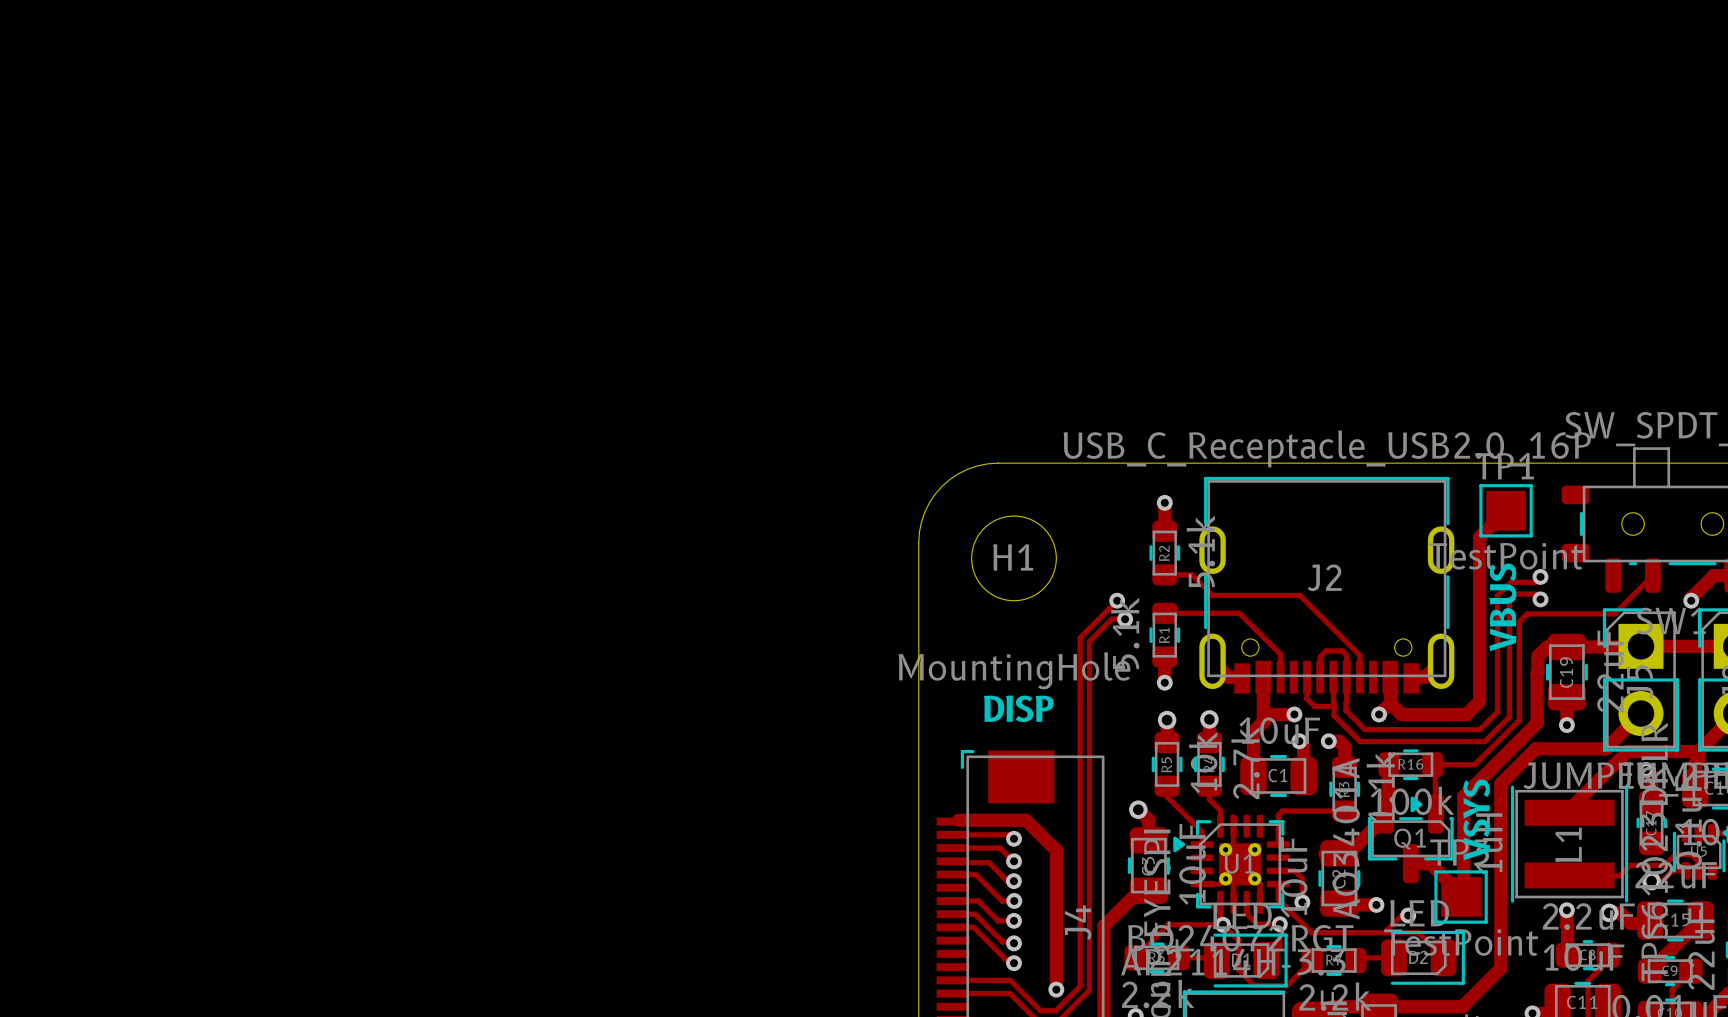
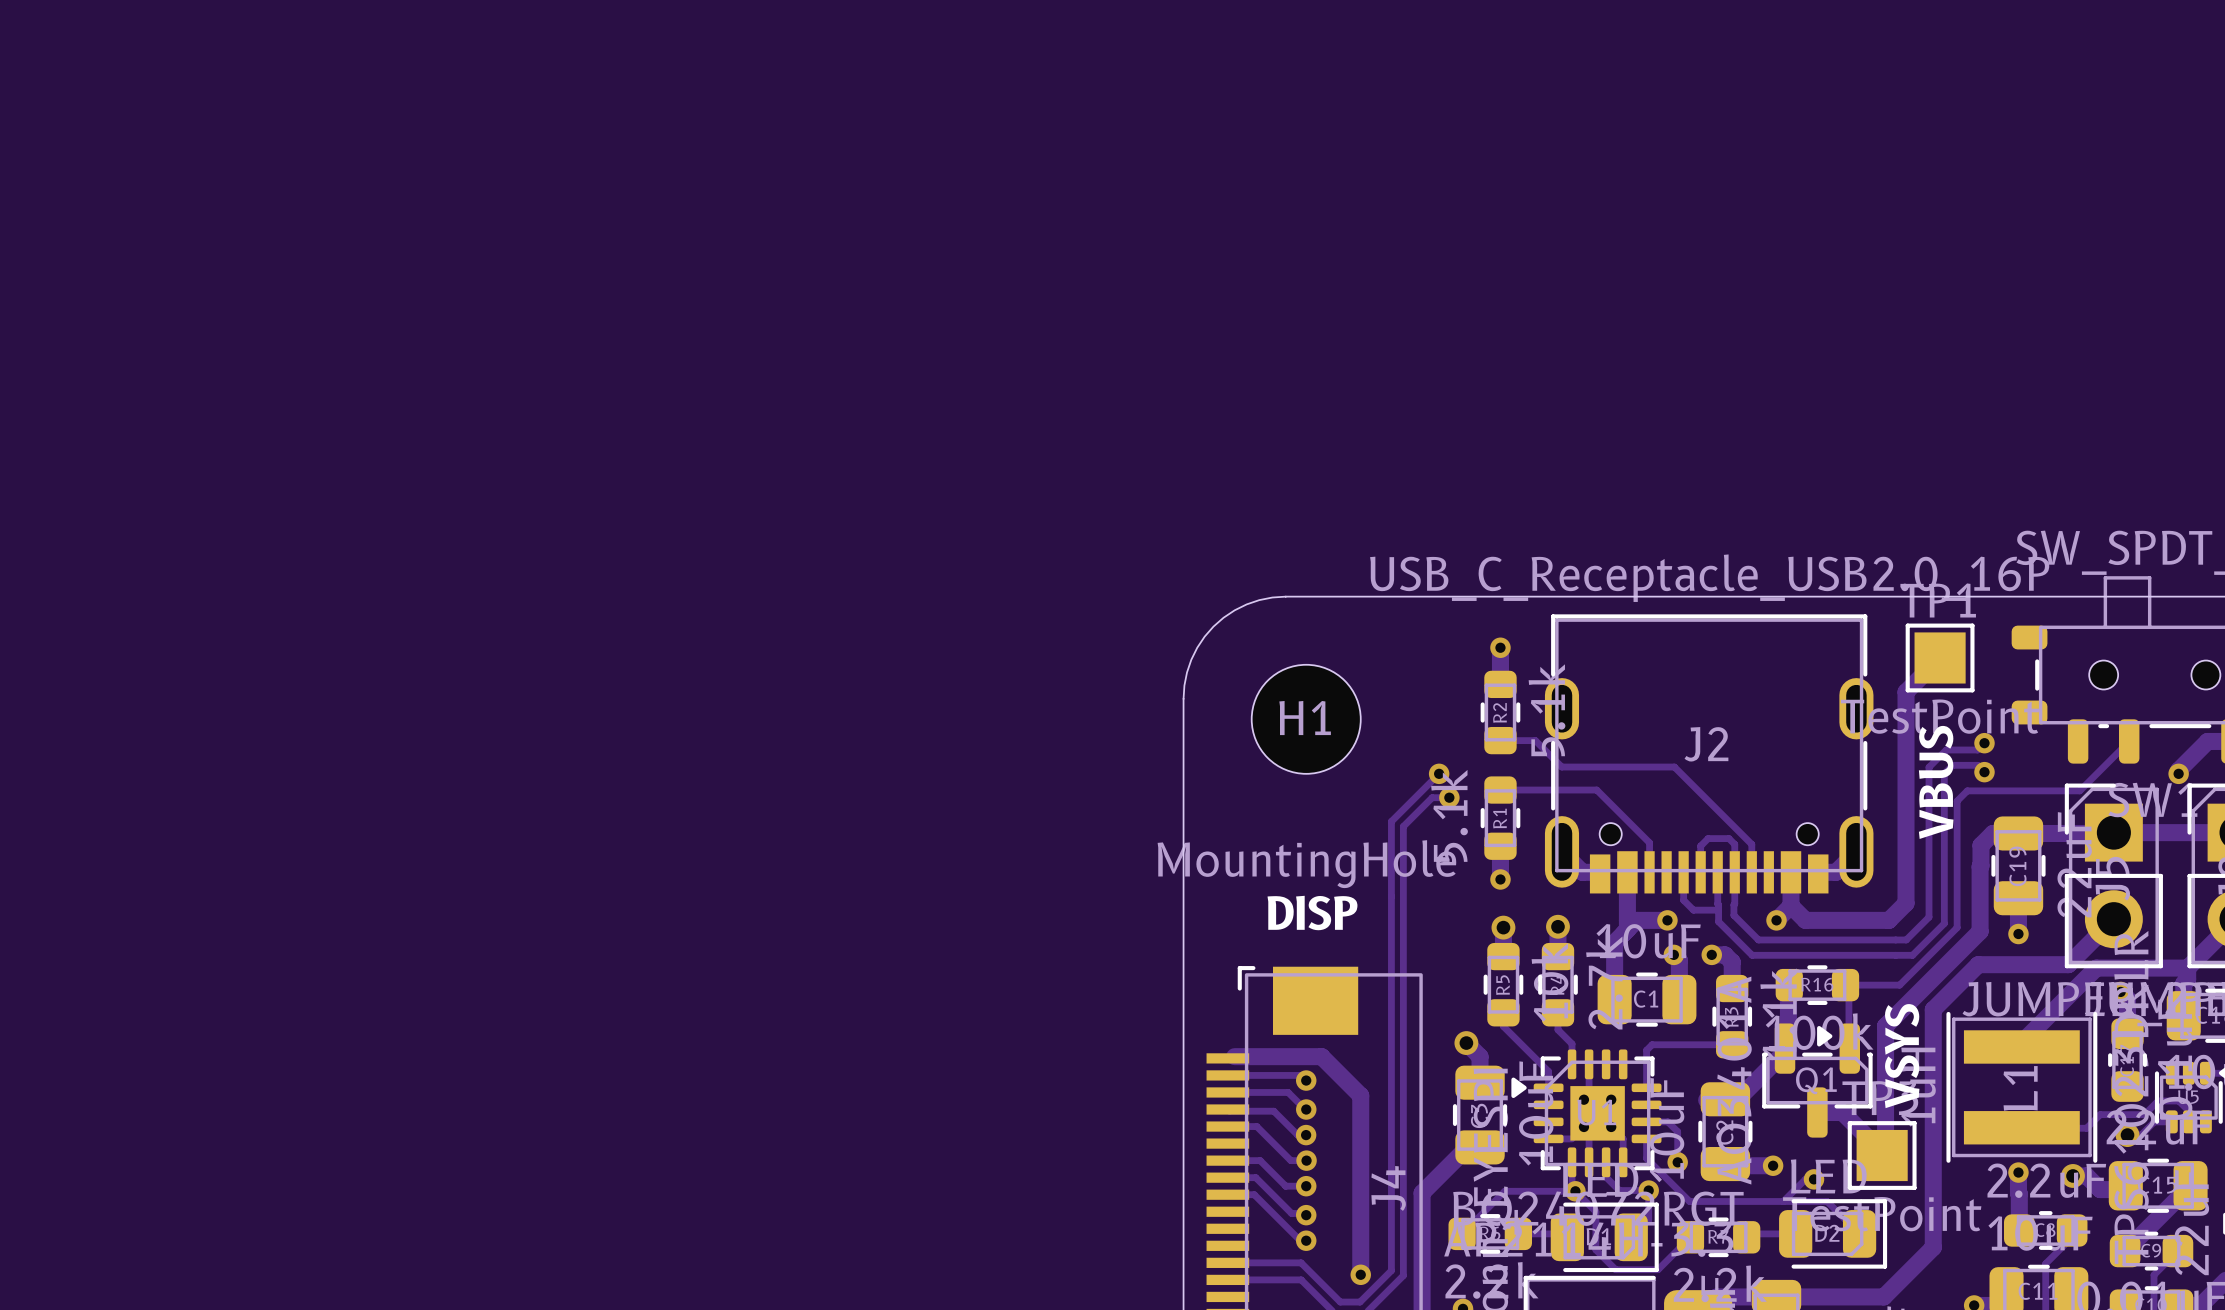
U1 footprint: [1173, 814, 1290, 914] -> [1511, 1049, 1662, 1178]

